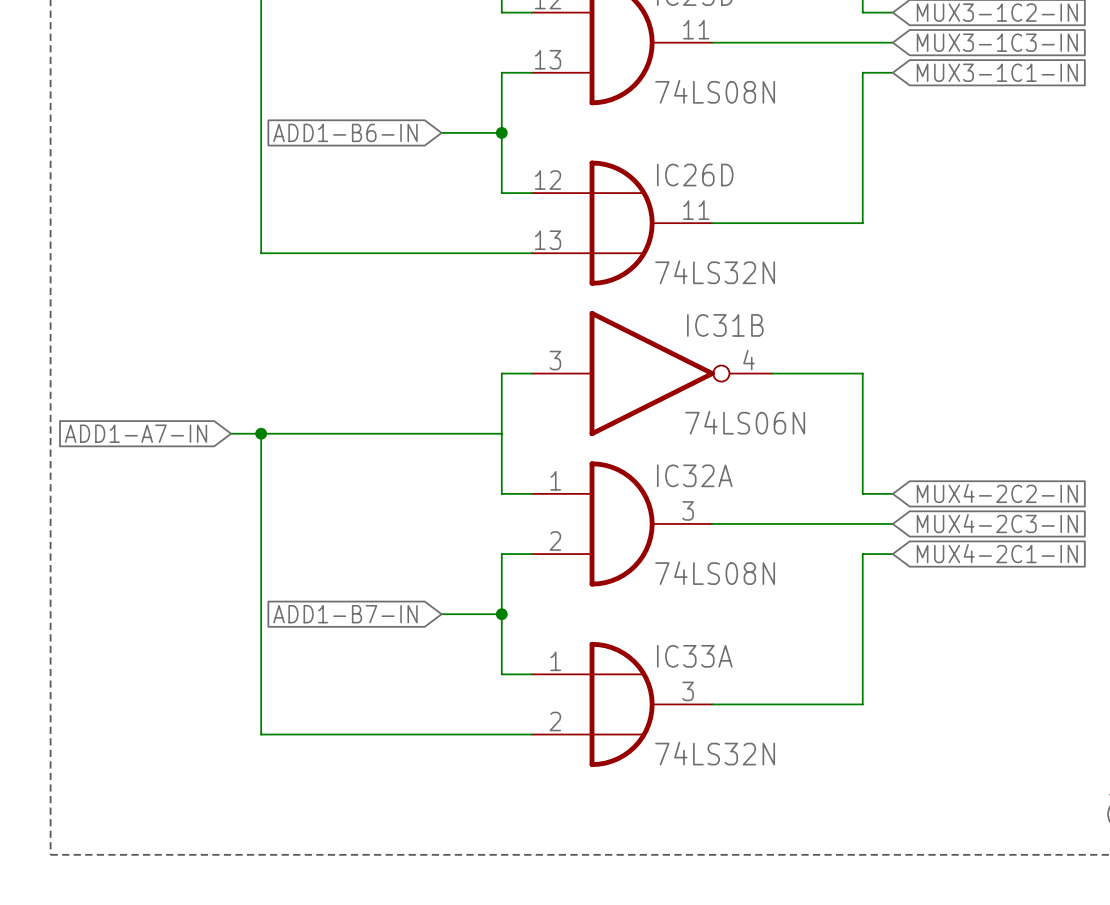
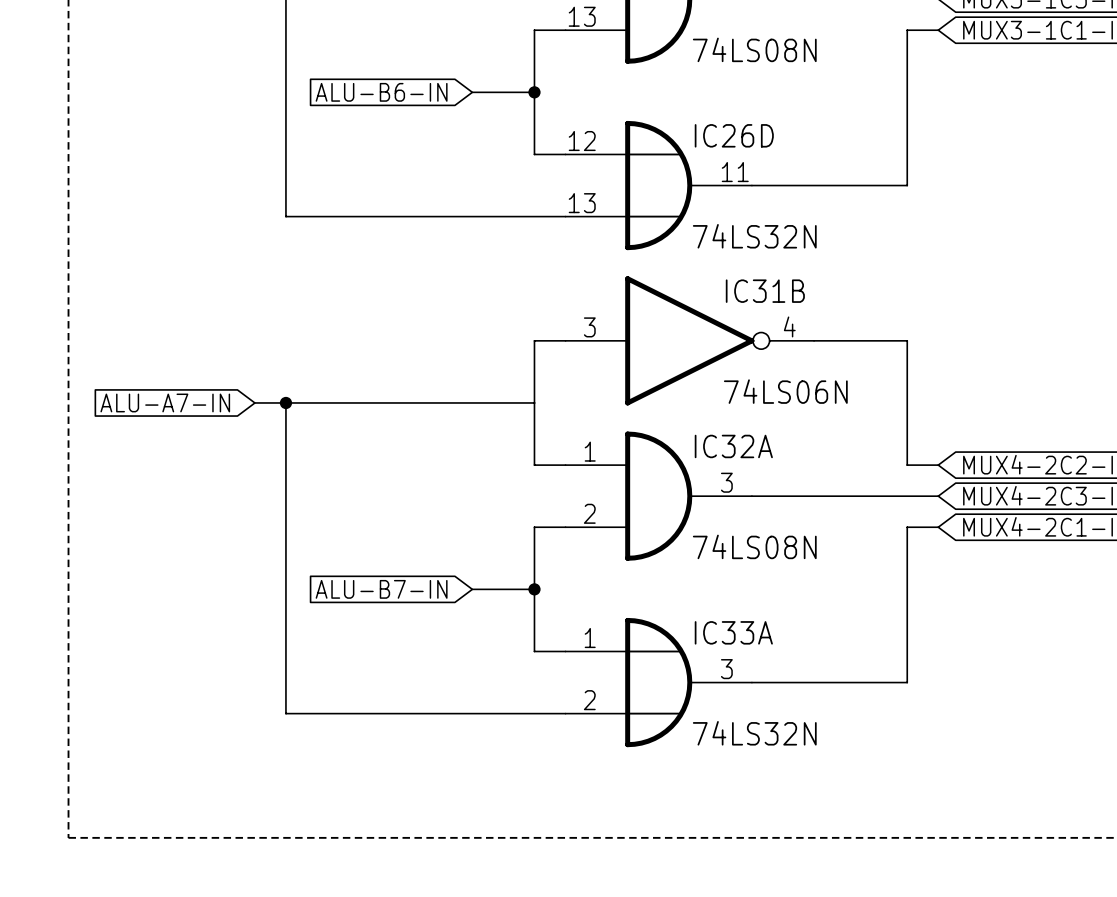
global label: ADD1-B6-IN (345, 132) -> ALU-B6-IN (381, 92)
global label: ADD1-A7-IN (135, 433) -> ALU-A7-IN (165, 402)
global label: ADD1-B7-IN (345, 614) -> ALU-B7-IN (381, 589)

